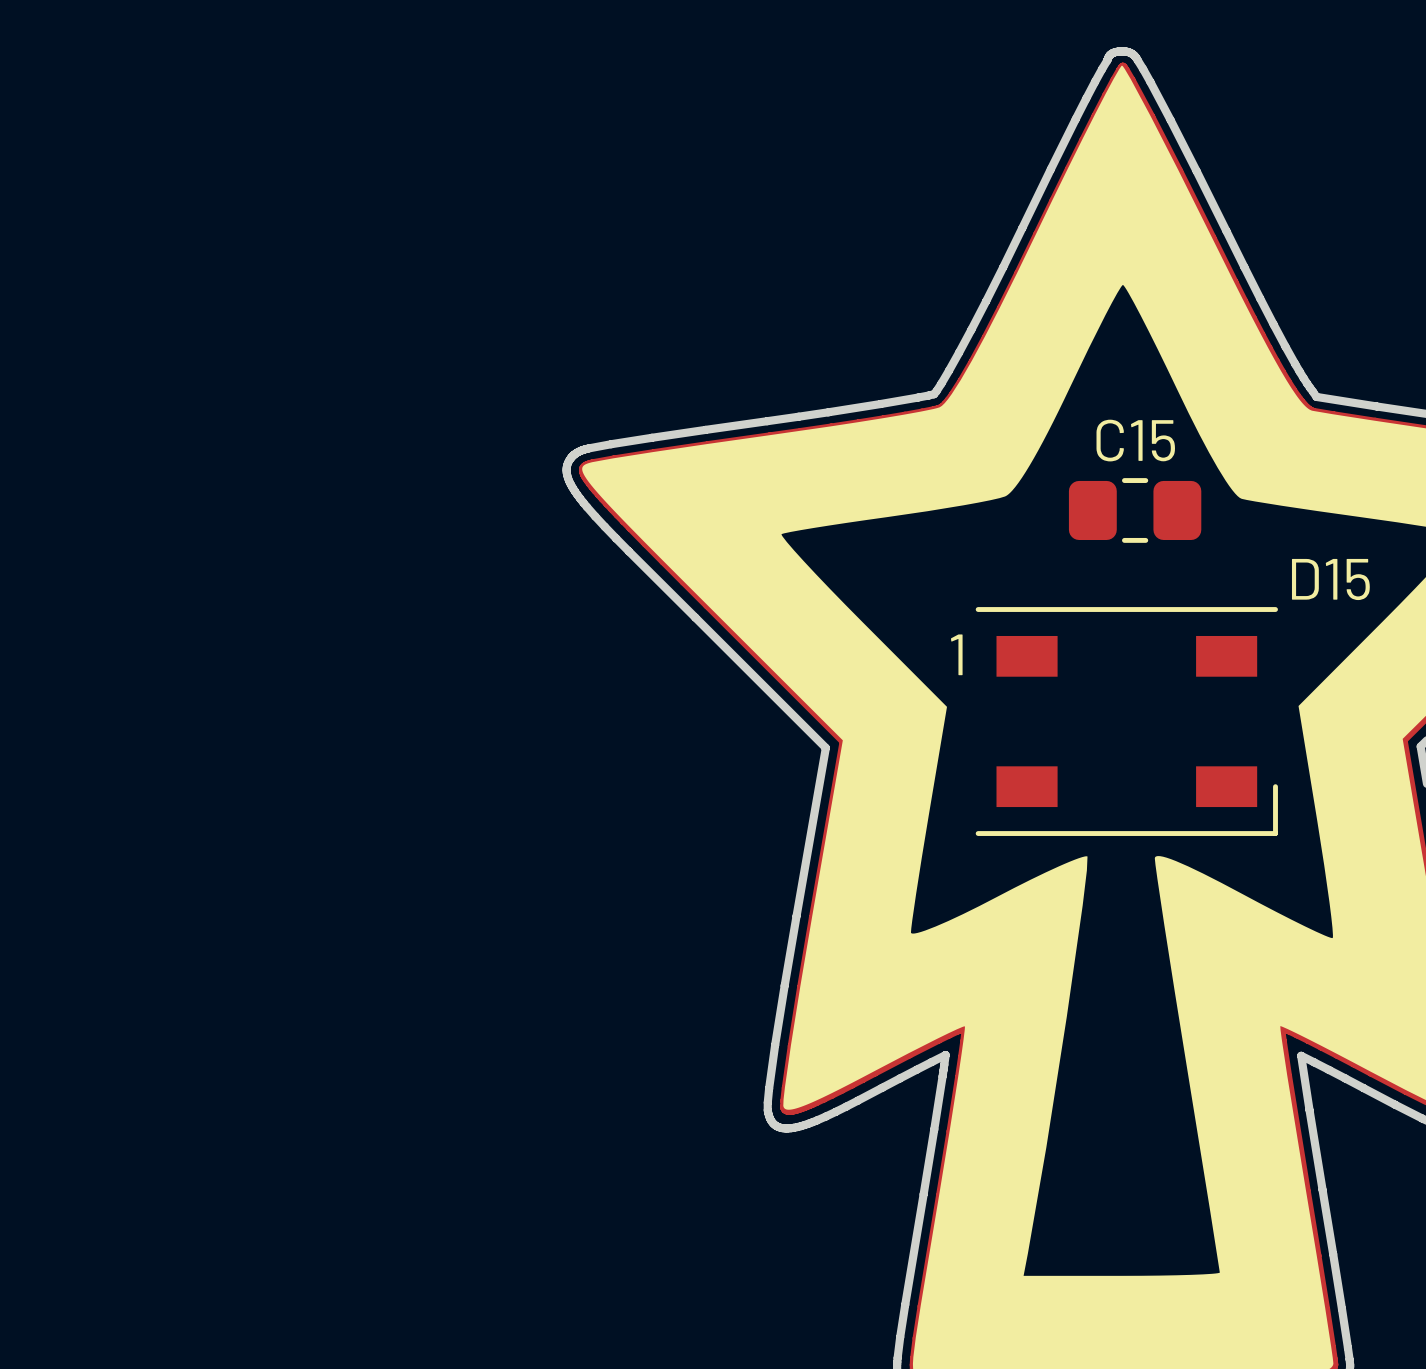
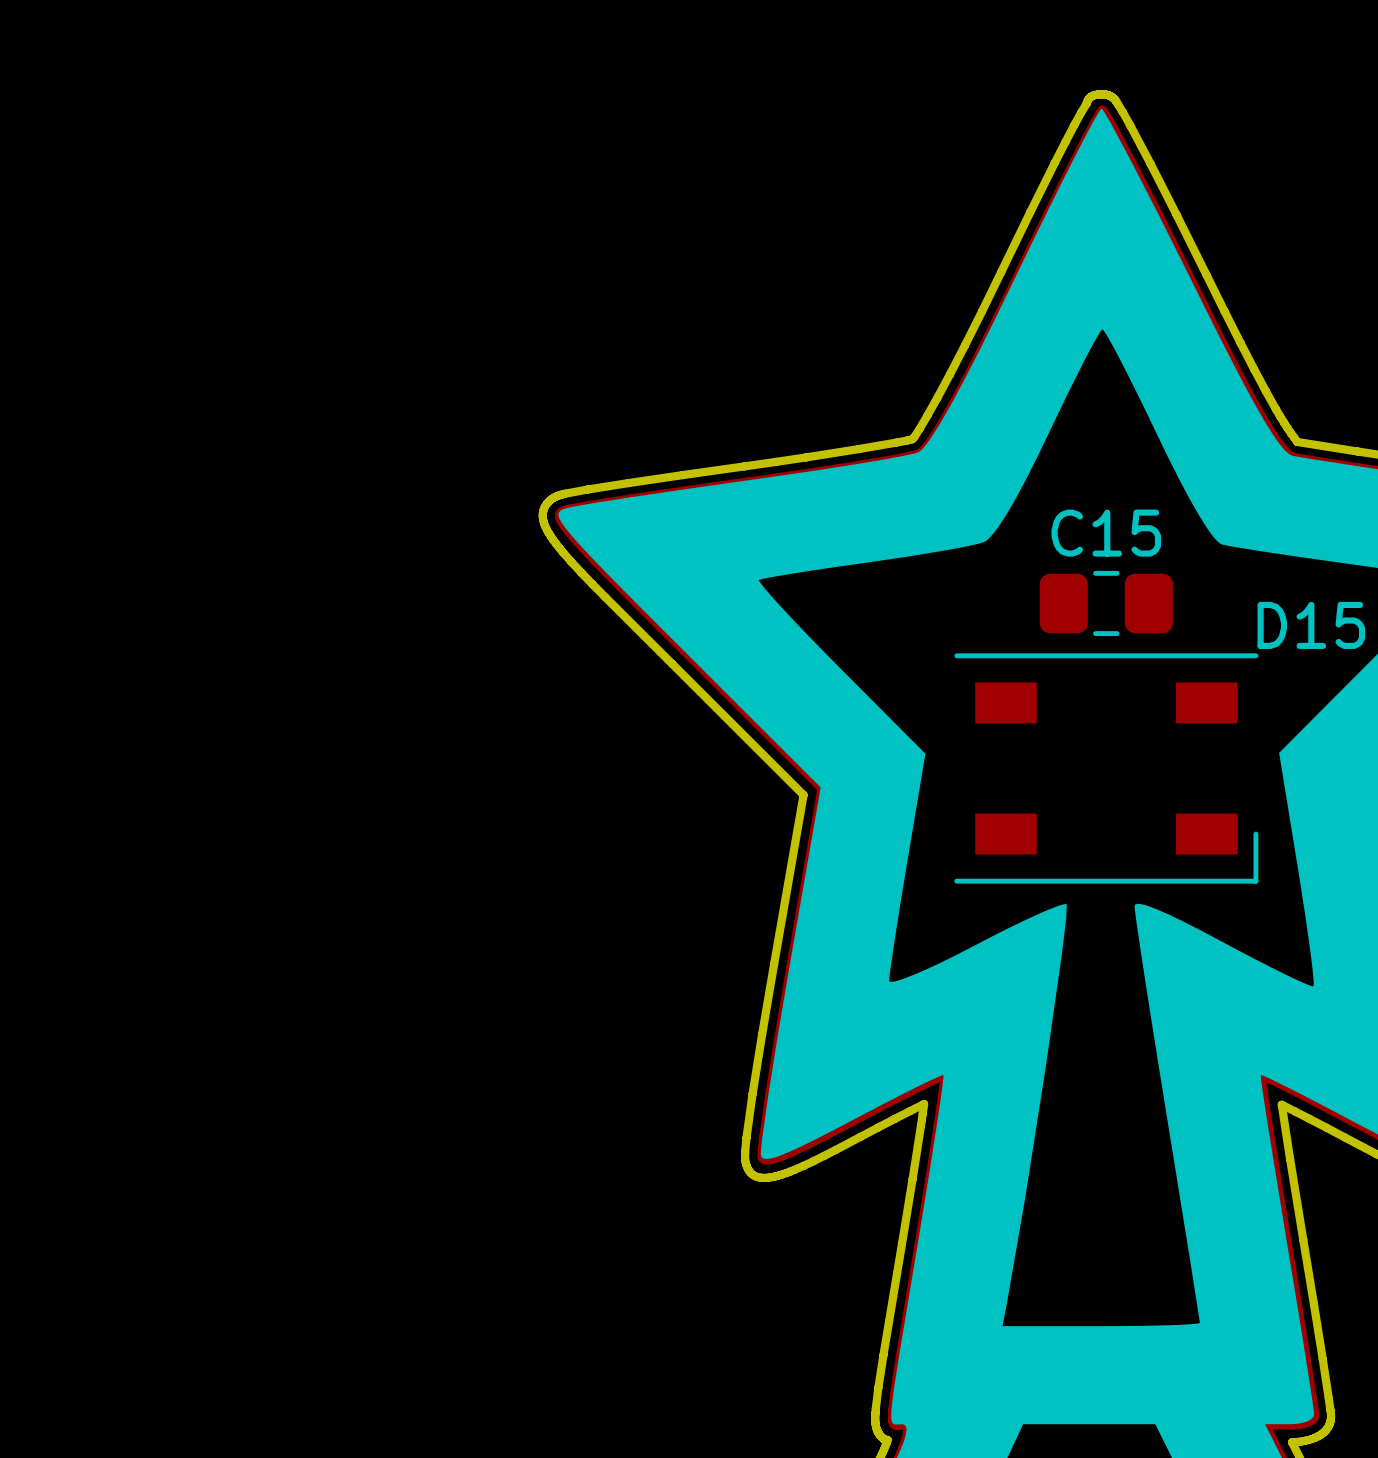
C15 position: (1135, 510) -> (1106, 603)
D15 text: 1 (956, 654) -> none

